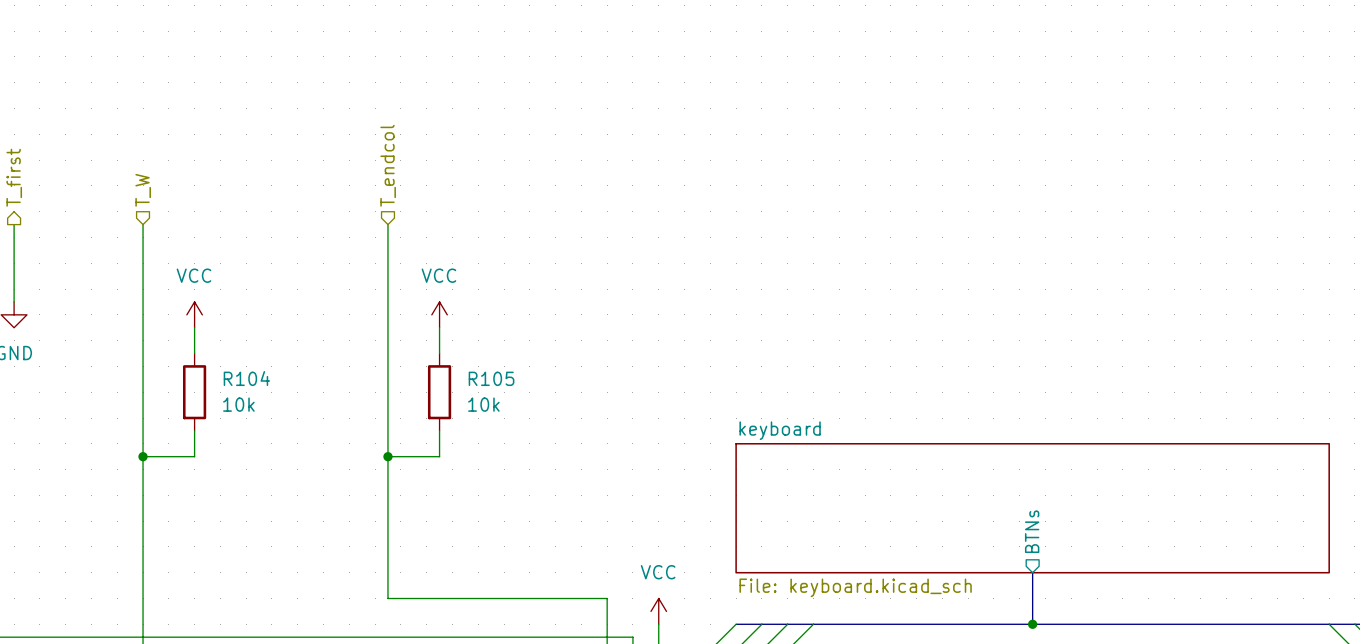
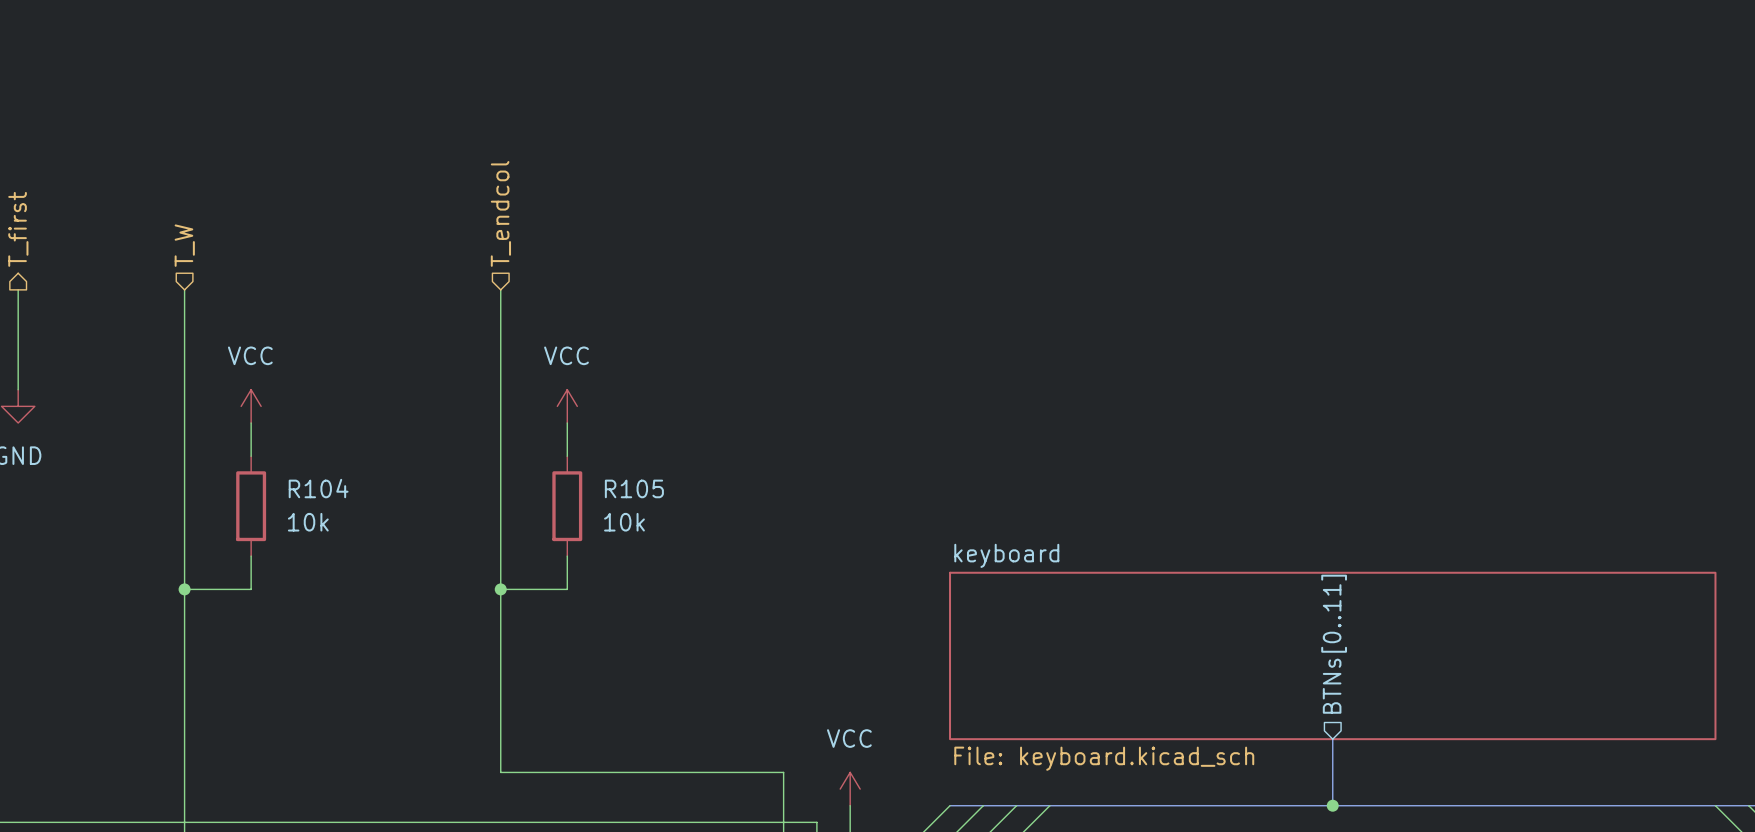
sheet pin: BTNs (1032, 531) -> BTNs[0..11] (1334, 644)

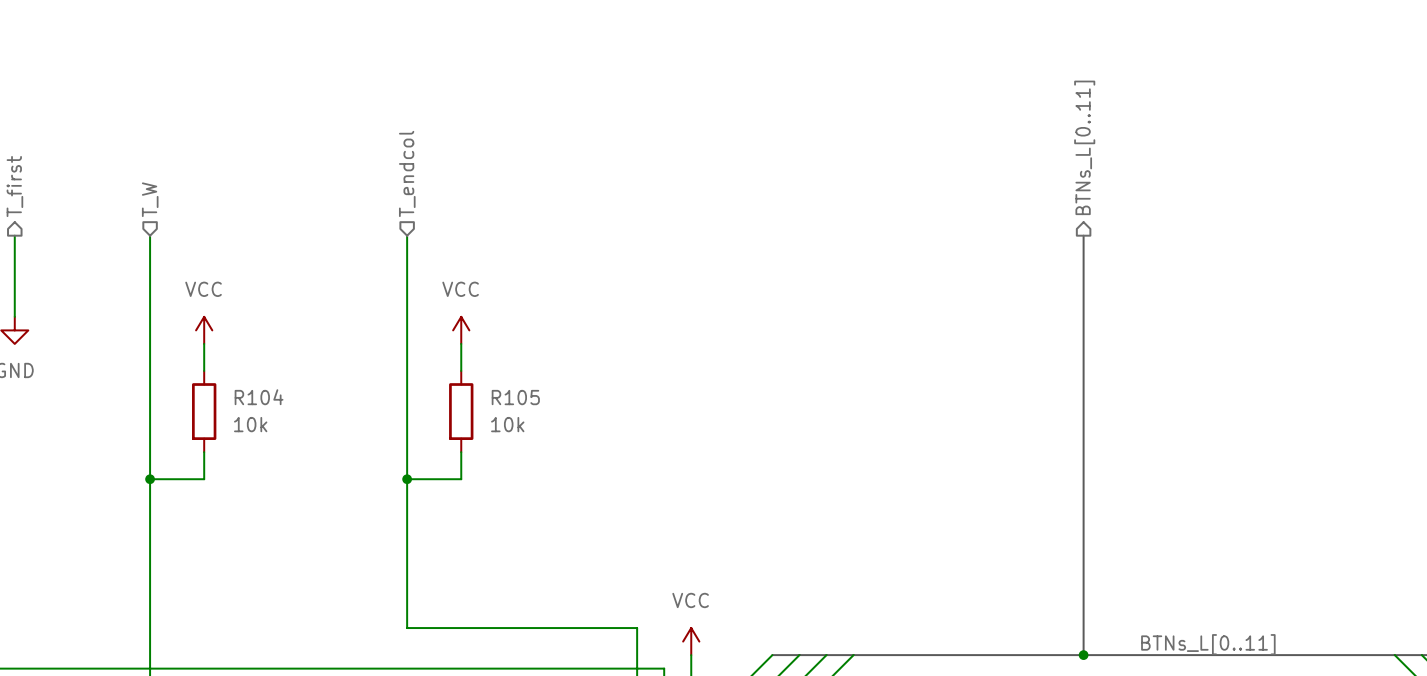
hierarchical label: none -> BTNs_L[0..11] (1084, 147)
bus: none -> (1083, 235) (1083, 600)
sheet pin: BTNs[0..11] (1334, 644) -> none
sheet keyboard: File: keyboard.kicad_sch (1332, 655) -> none
label: none -> BTNs_L[0..11] (1208, 644)

